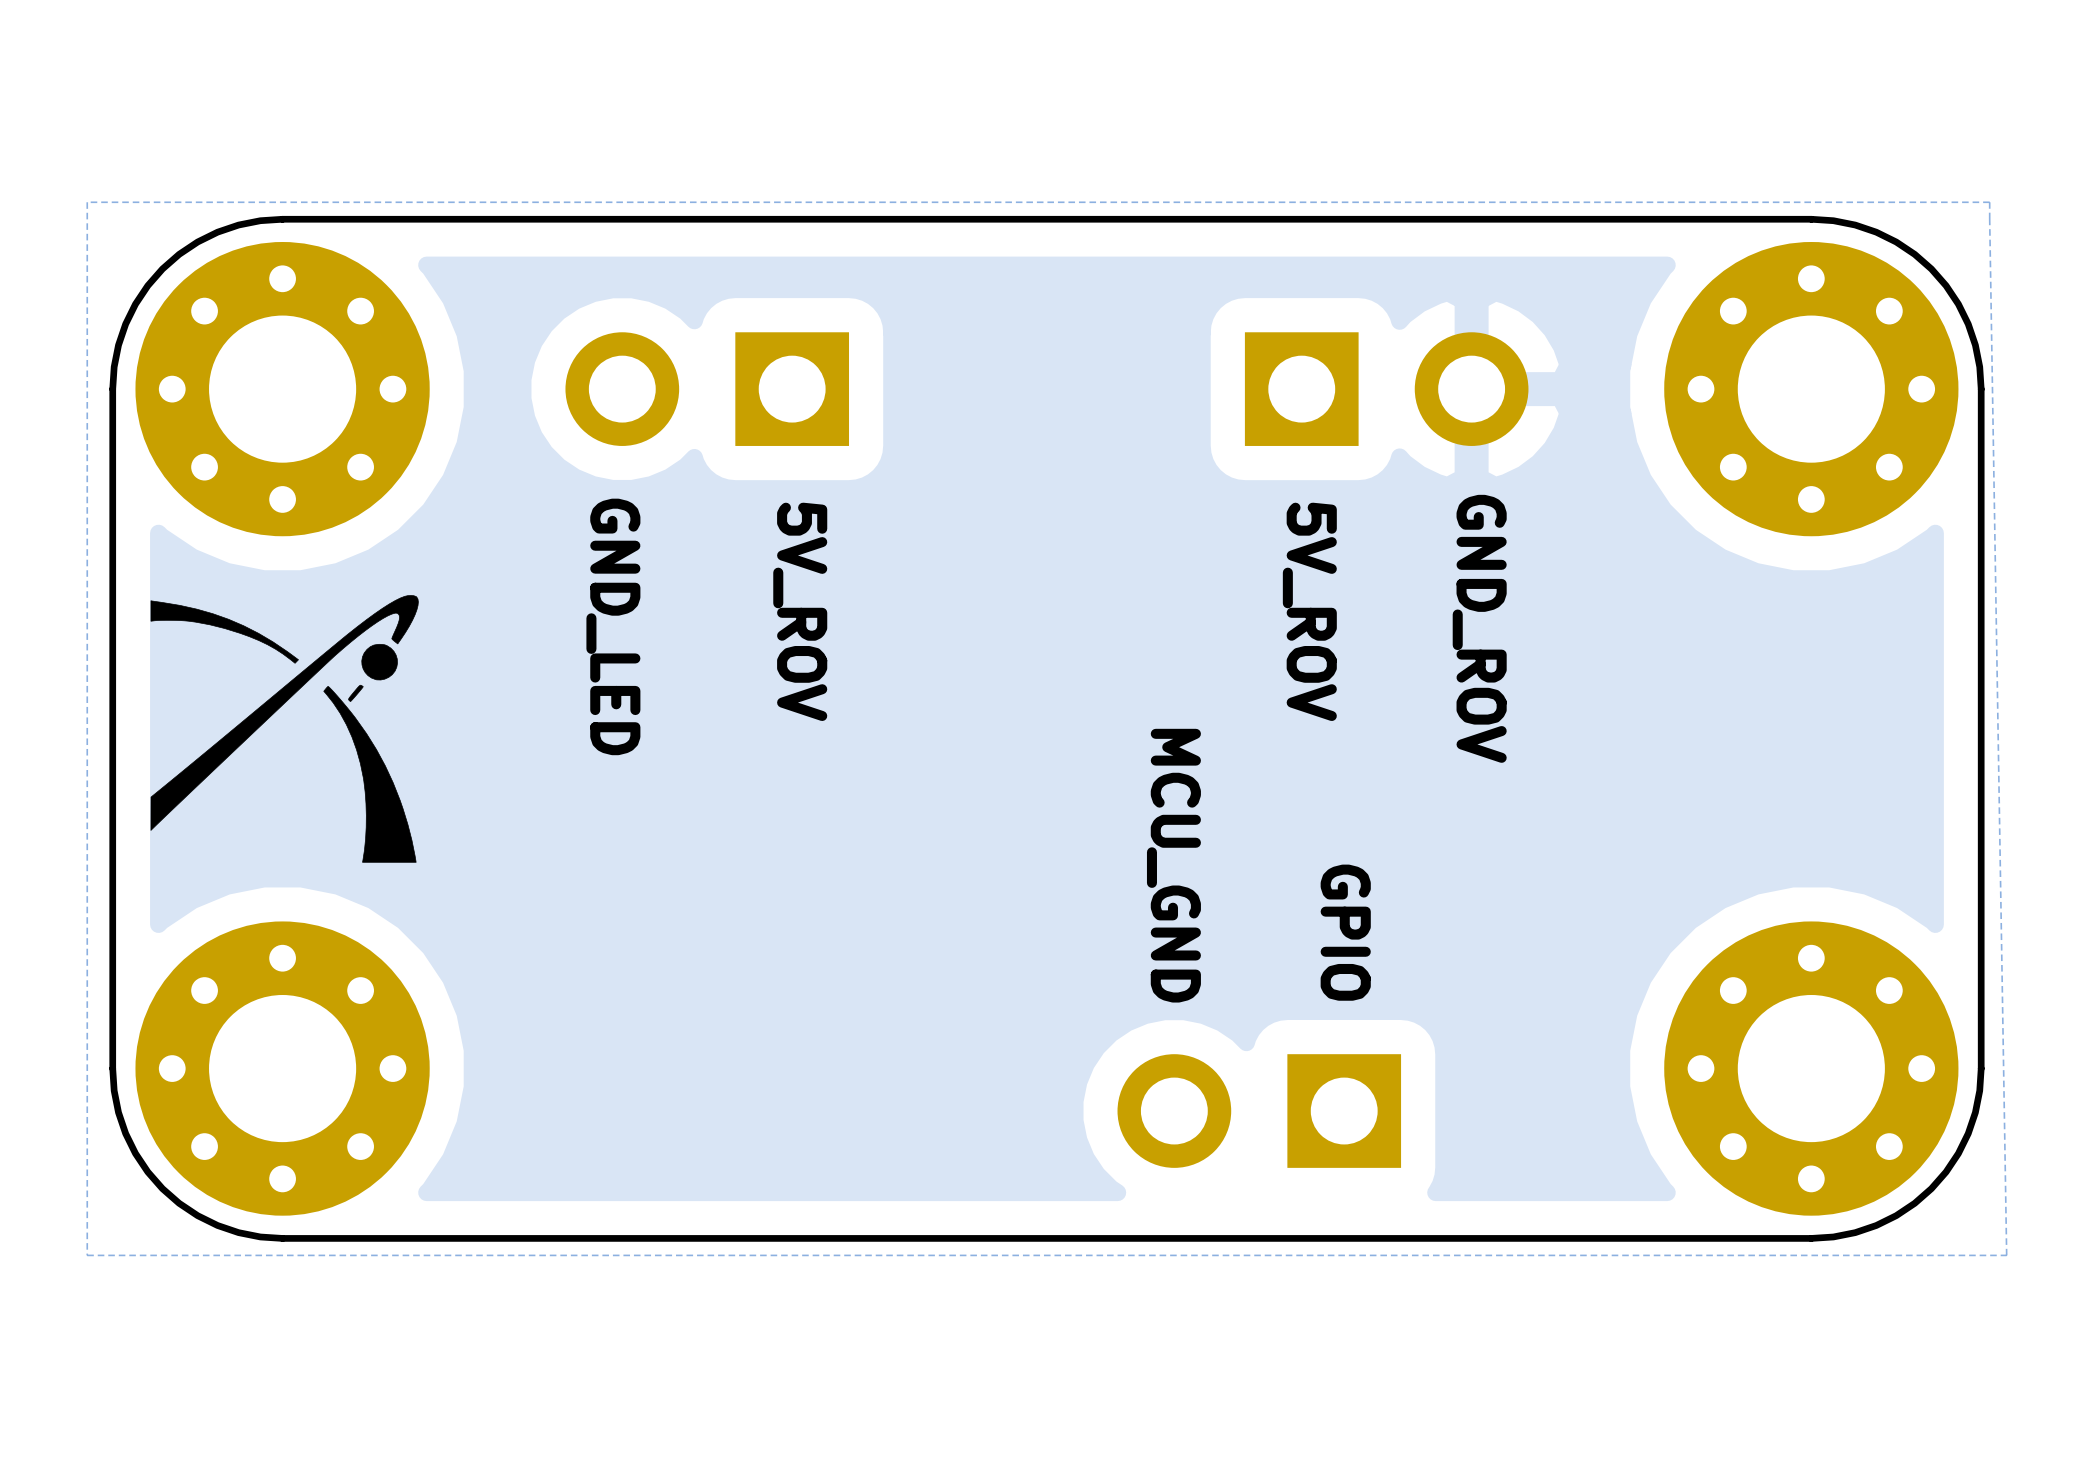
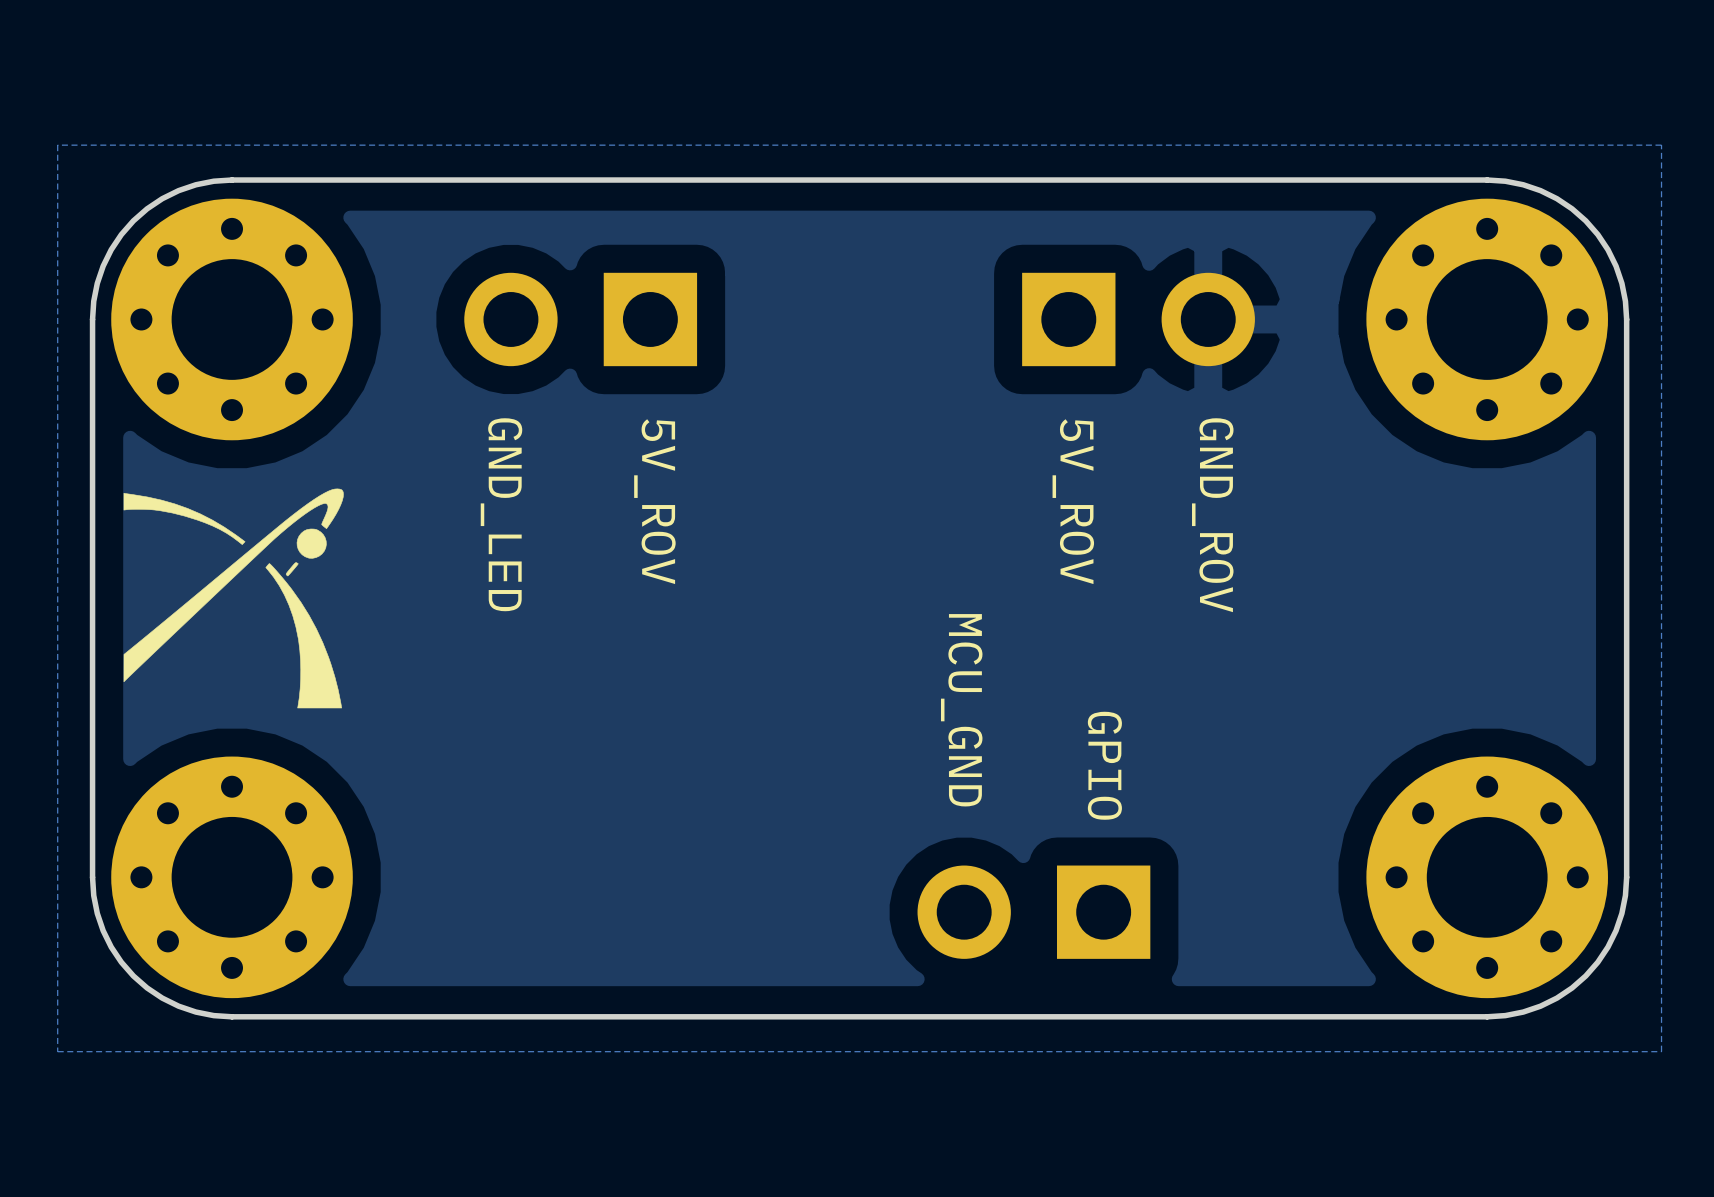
zone outline: (1989, 202) (2006, 1255) (87, 1255) (87, 202) (1989, 202) -> (1661, 145) (1661, 1051) (57, 1051) (57, 145) (1661, 145)

